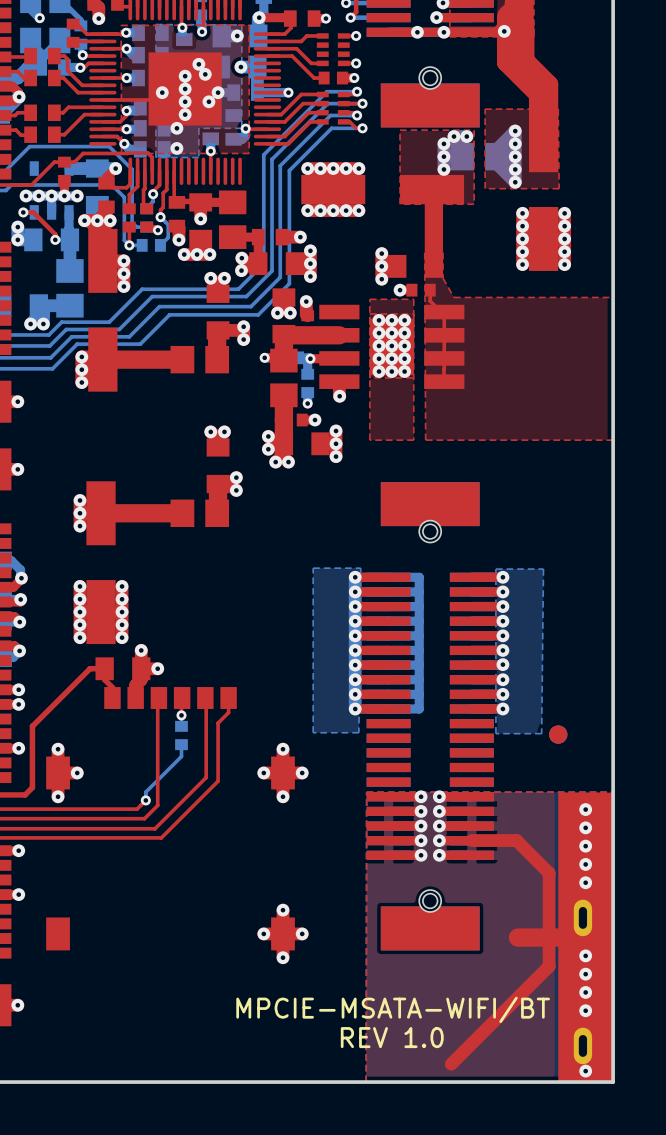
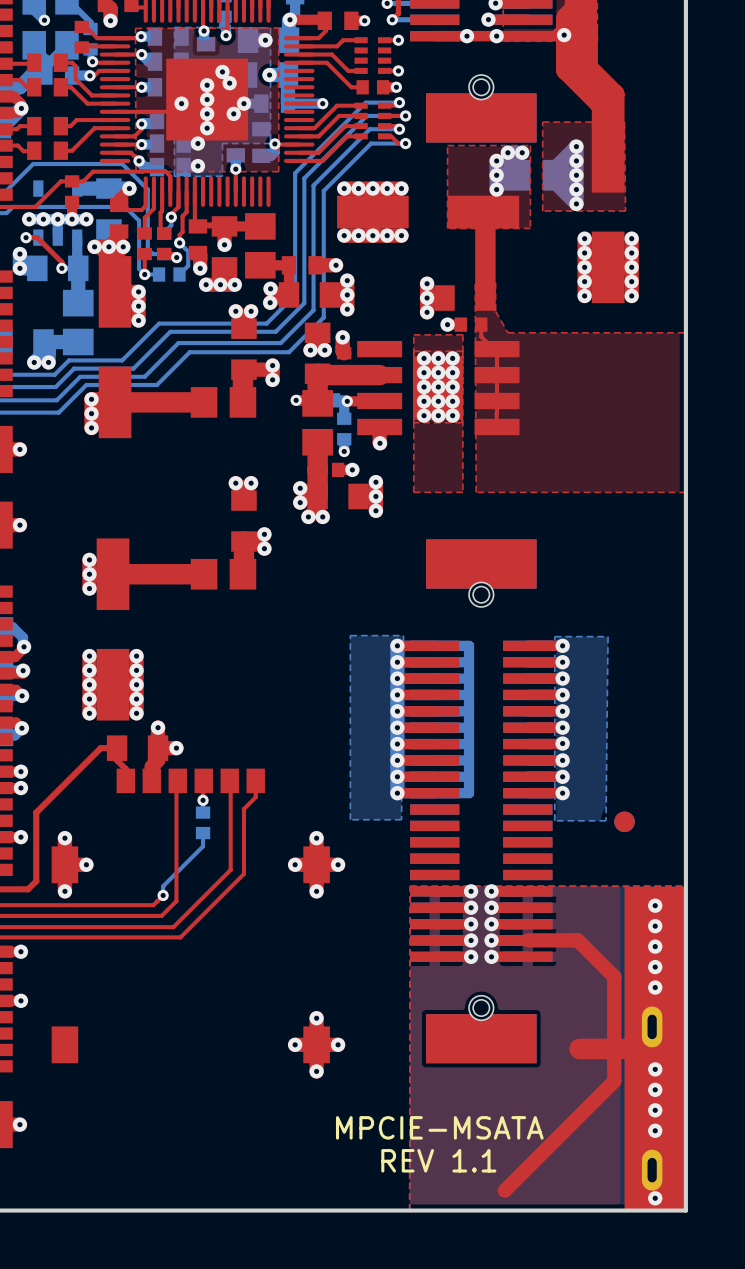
text: MPCIE-MSATA-WIFI/BT (393, 1009) -> MPCIE-MSATA (439, 1127)
text: REV 1.0 (392, 1037) -> REV 1.1 (438, 1160)

